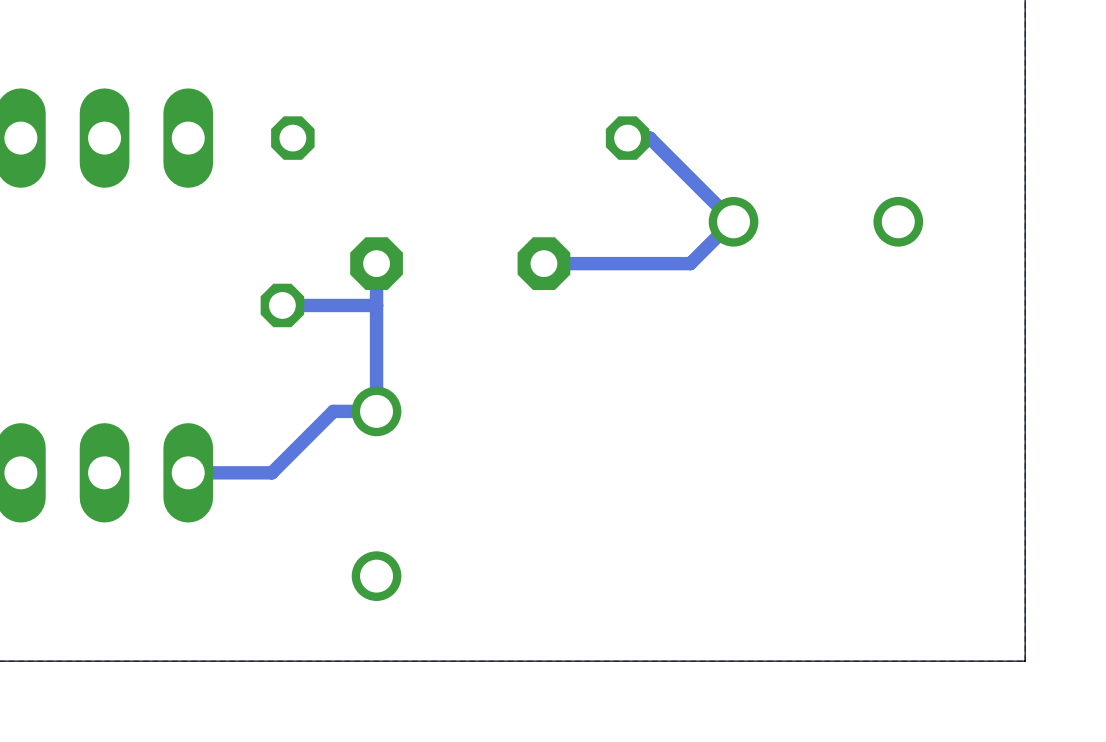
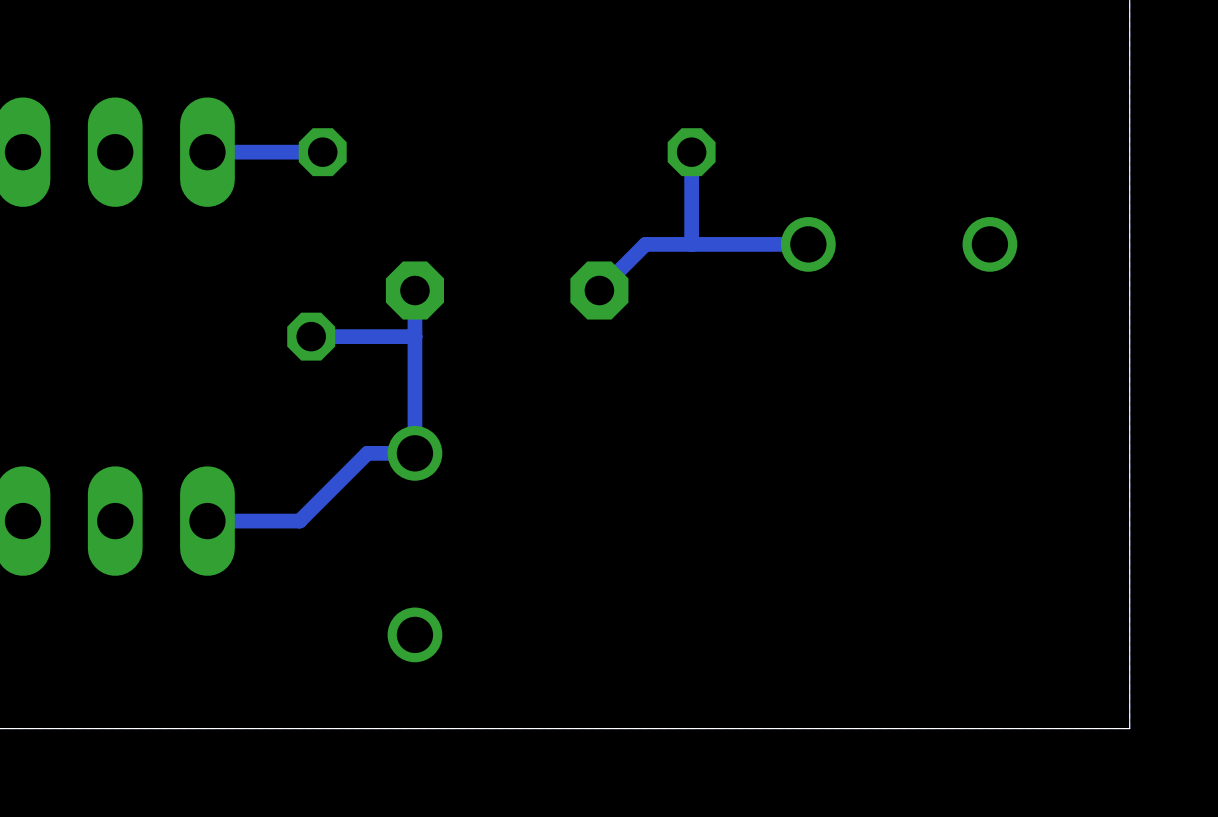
track: none -> (322, 152) (207, 152)
track: (627, 138) (649, 138) (733, 221) -> (691, 152) (691, 244)
track: (732, 221) (690, 263) (543, 263) -> (808, 244) (645, 244) (599, 290)

